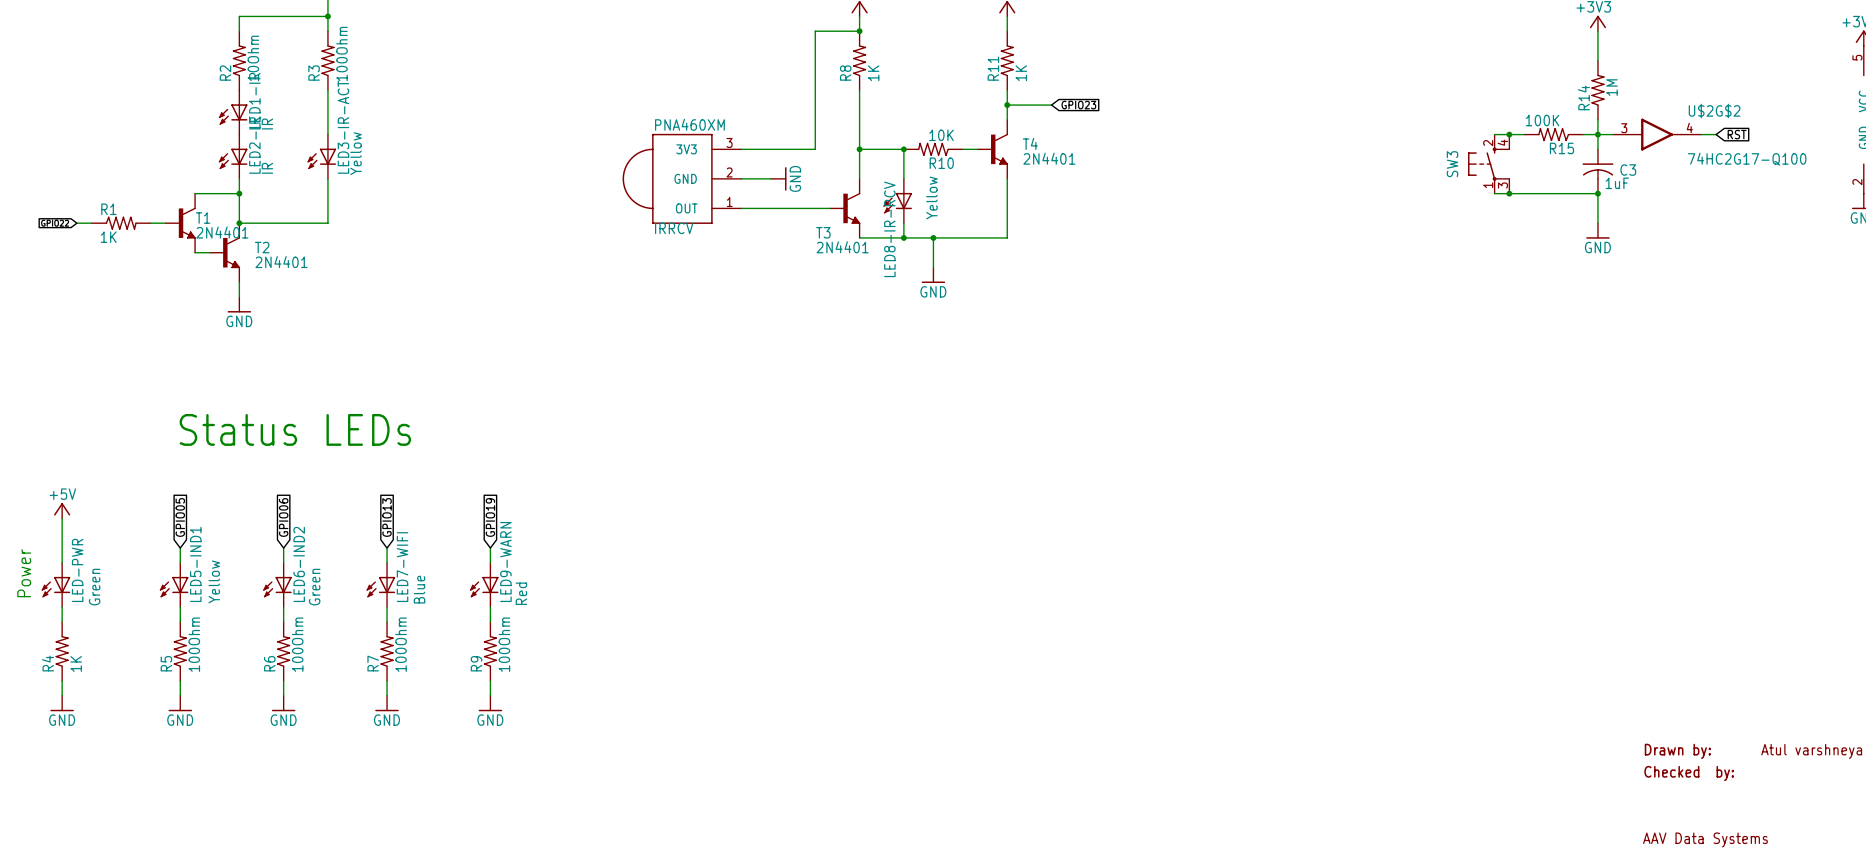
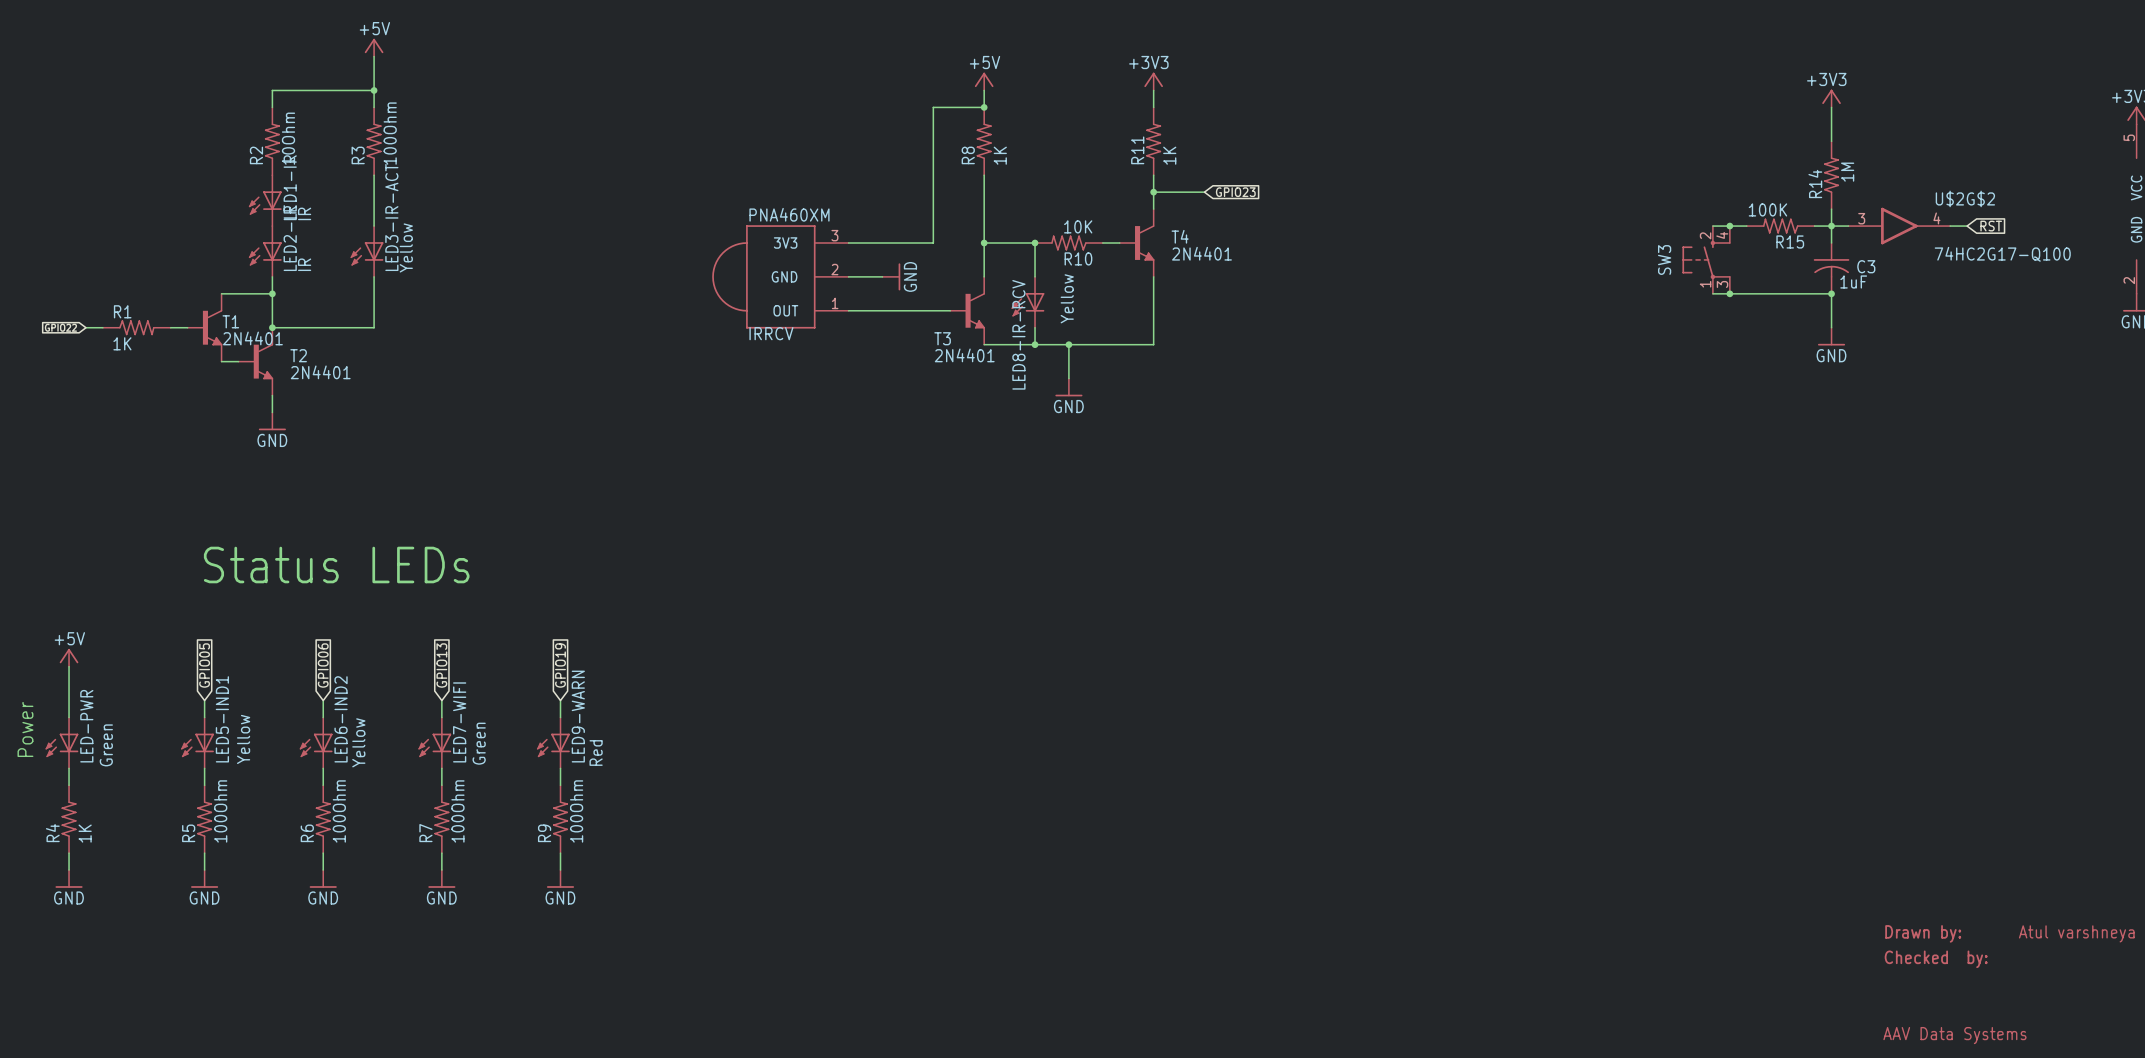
LED6-IND2 value: Green (314, 587) -> Yellow (358, 742)
LED7-WIFI value: Blue (419, 589) -> Green (479, 743)

